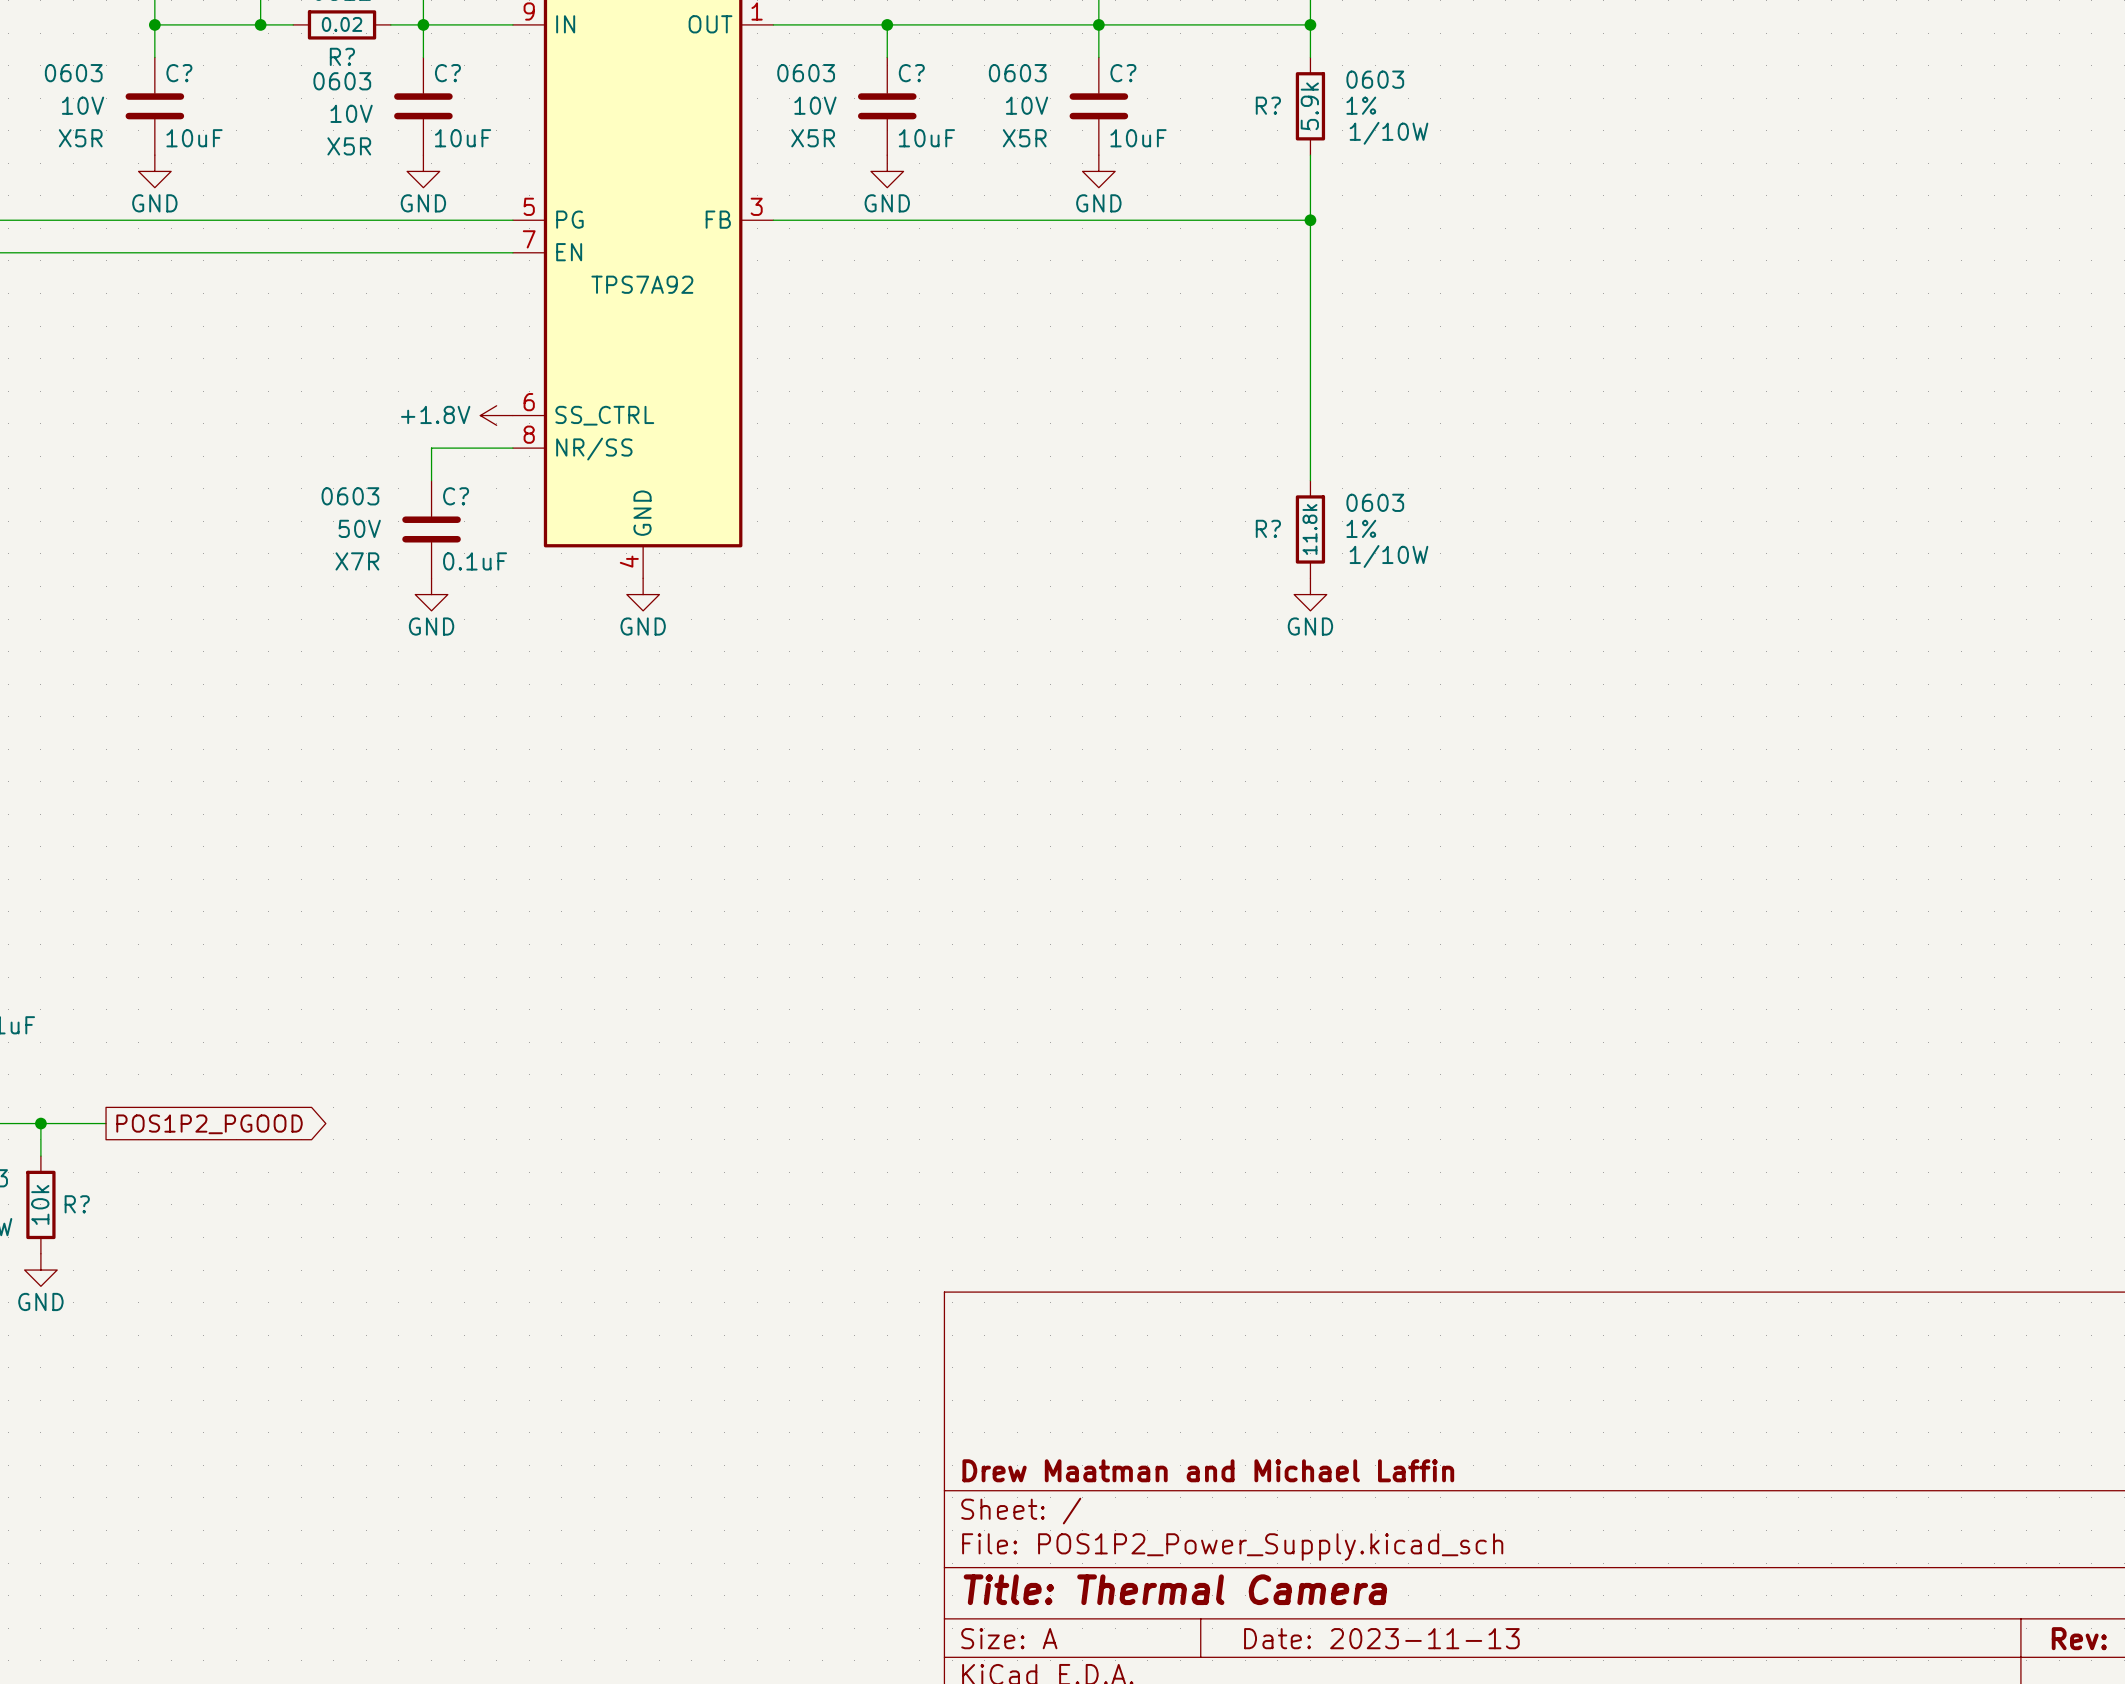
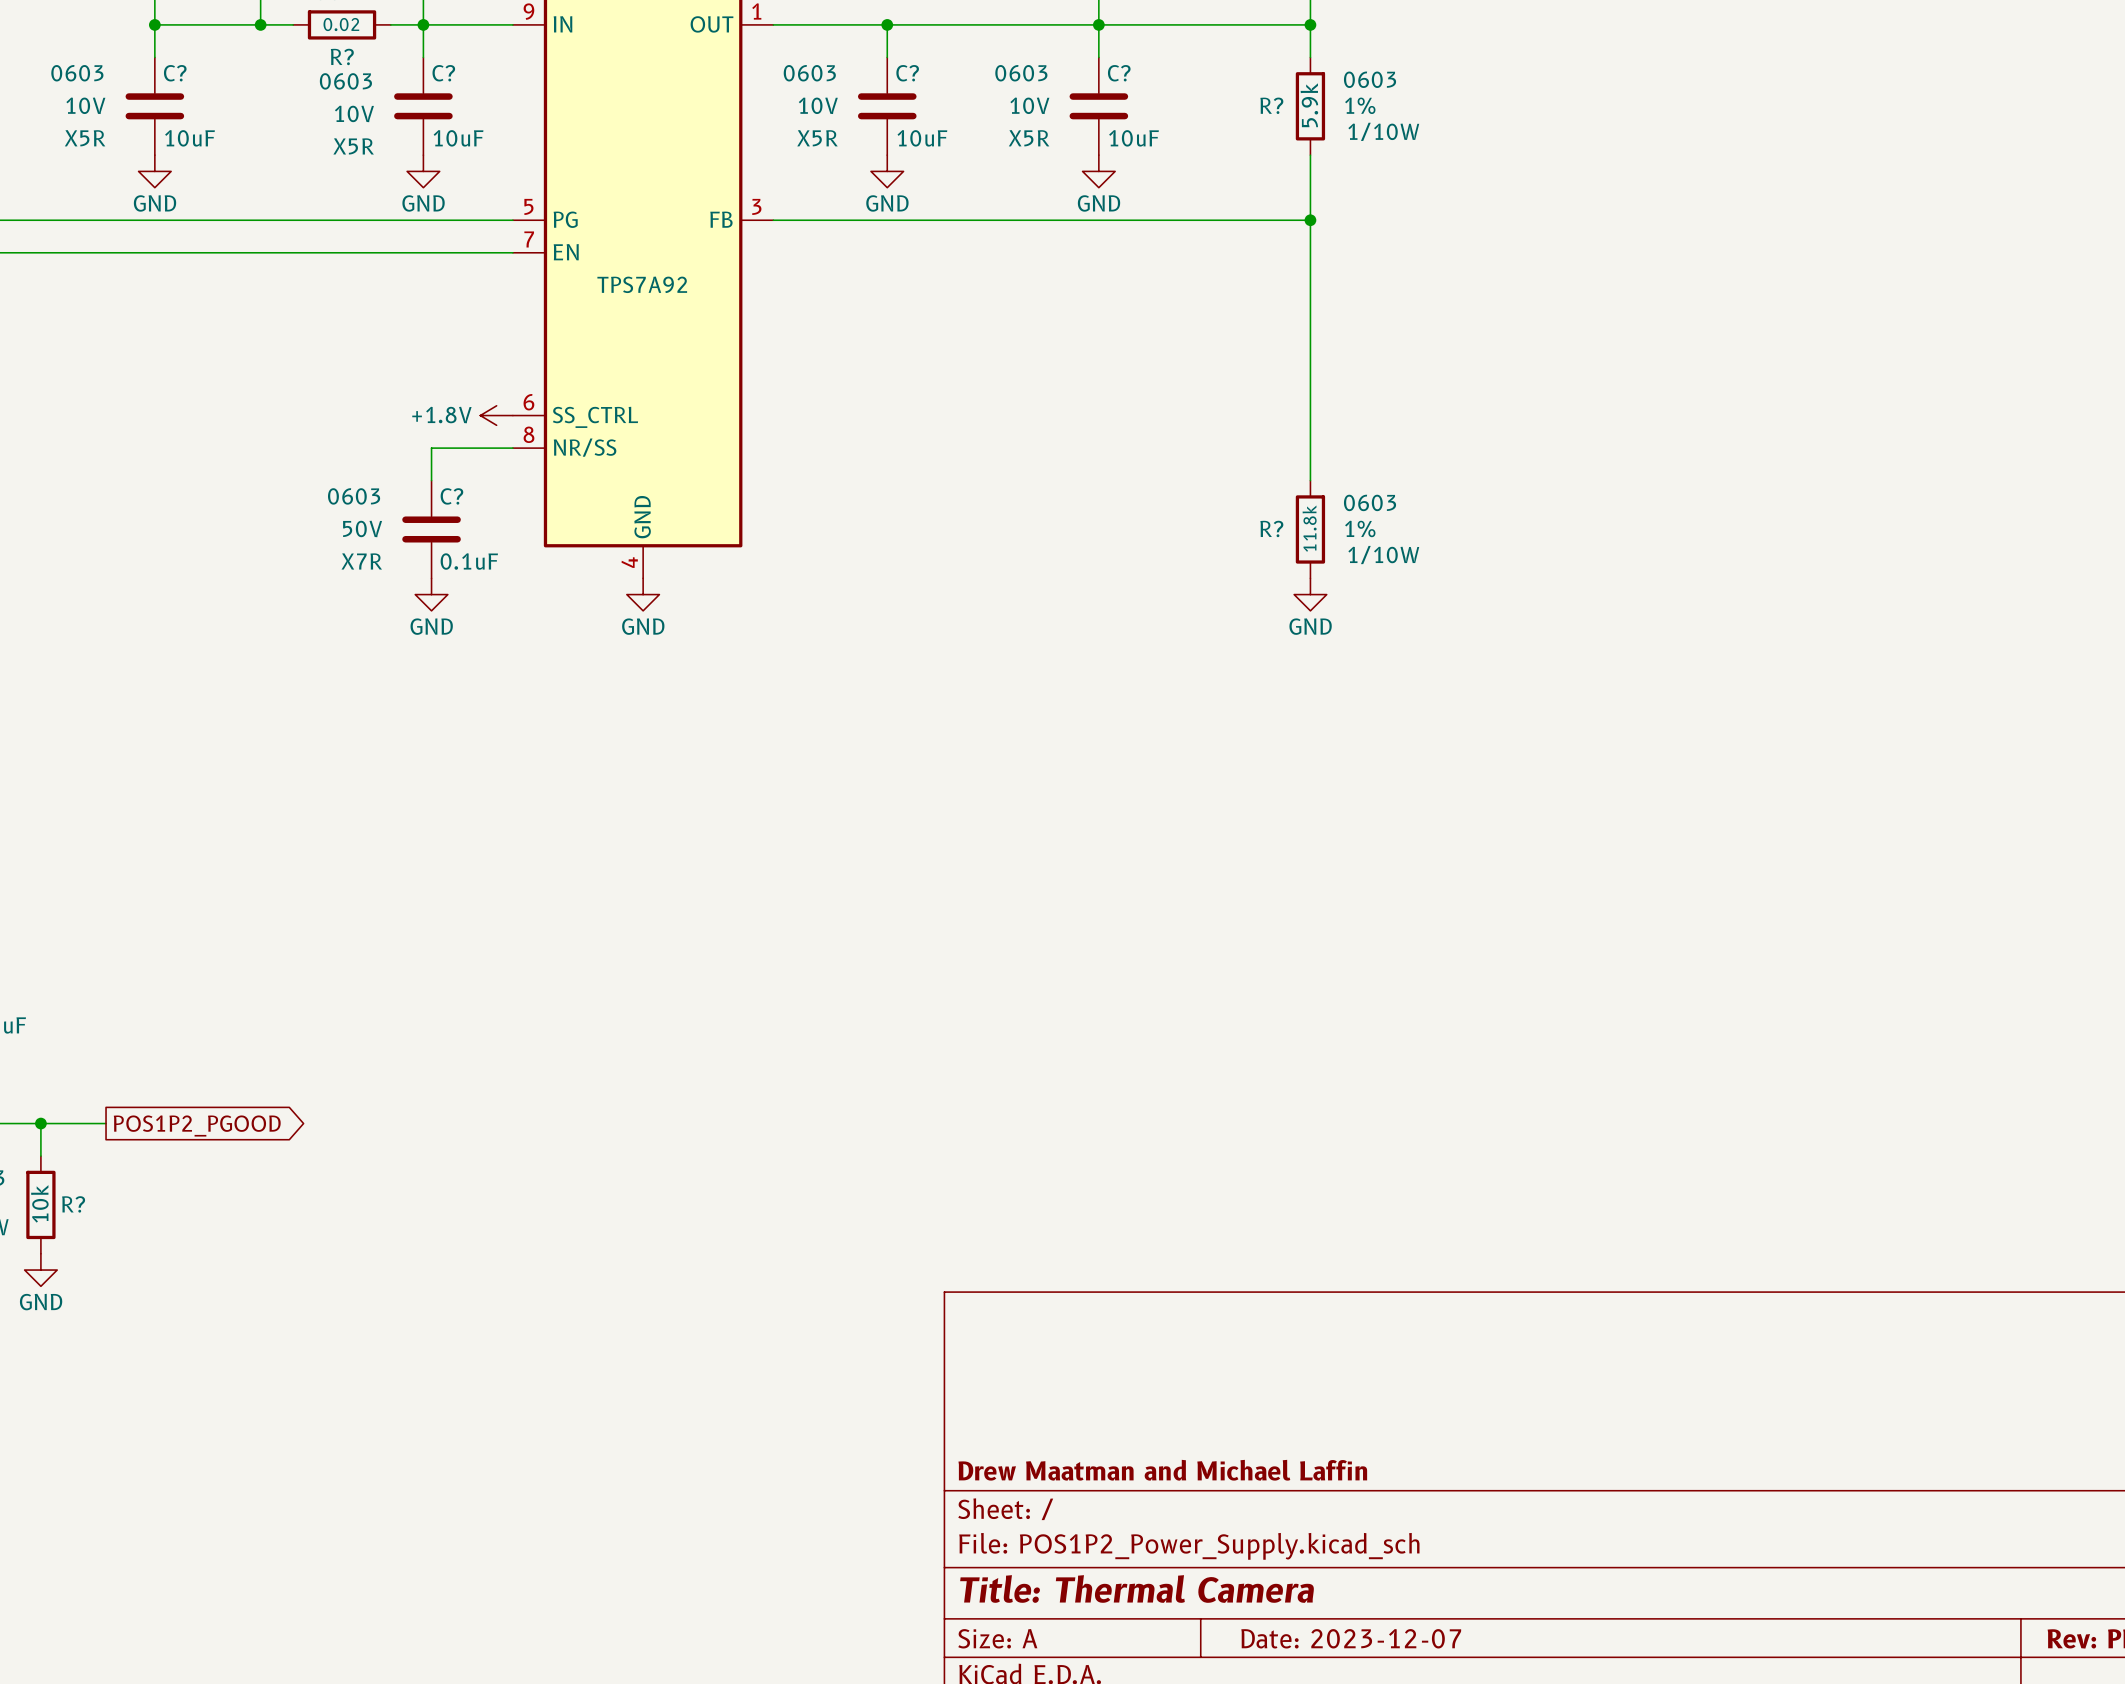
title block: Date: 2023-11-13 (1381, 1638) -> Date: 2023-12-07 (1351, 1638)

